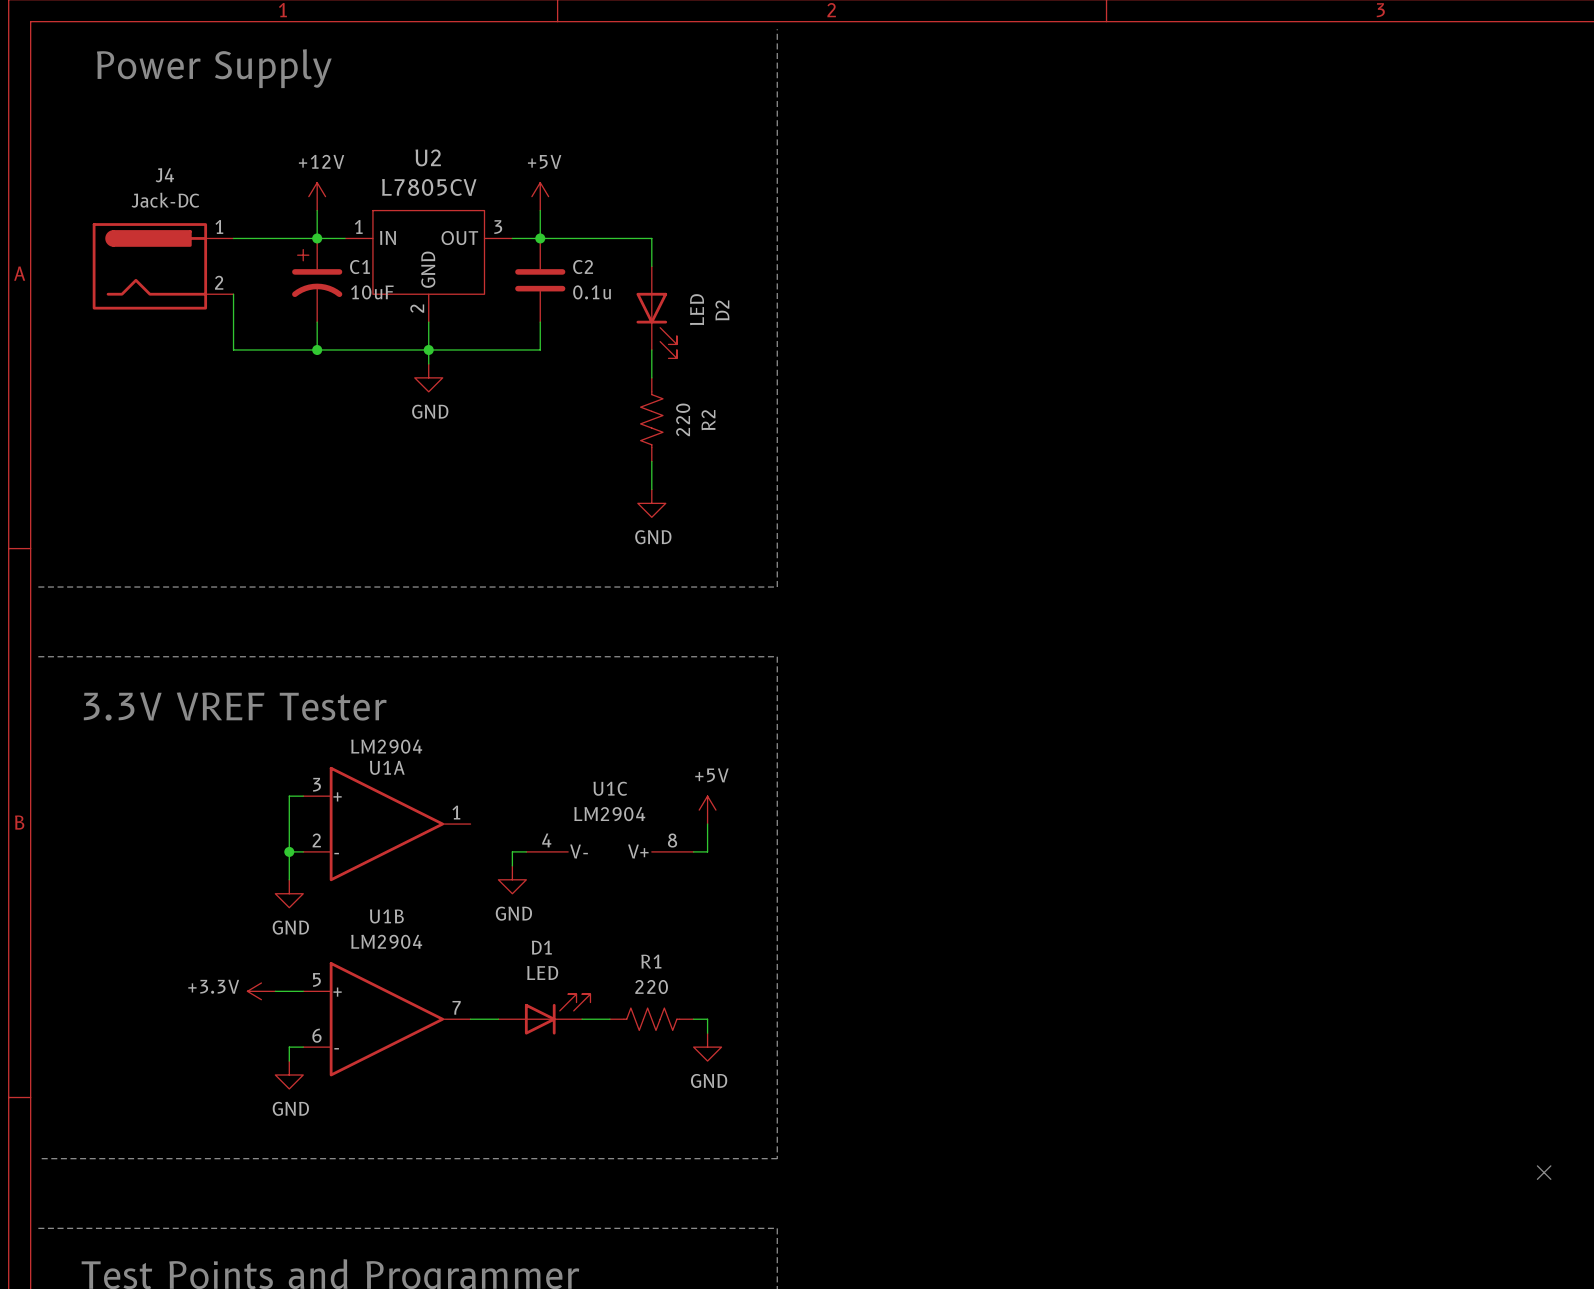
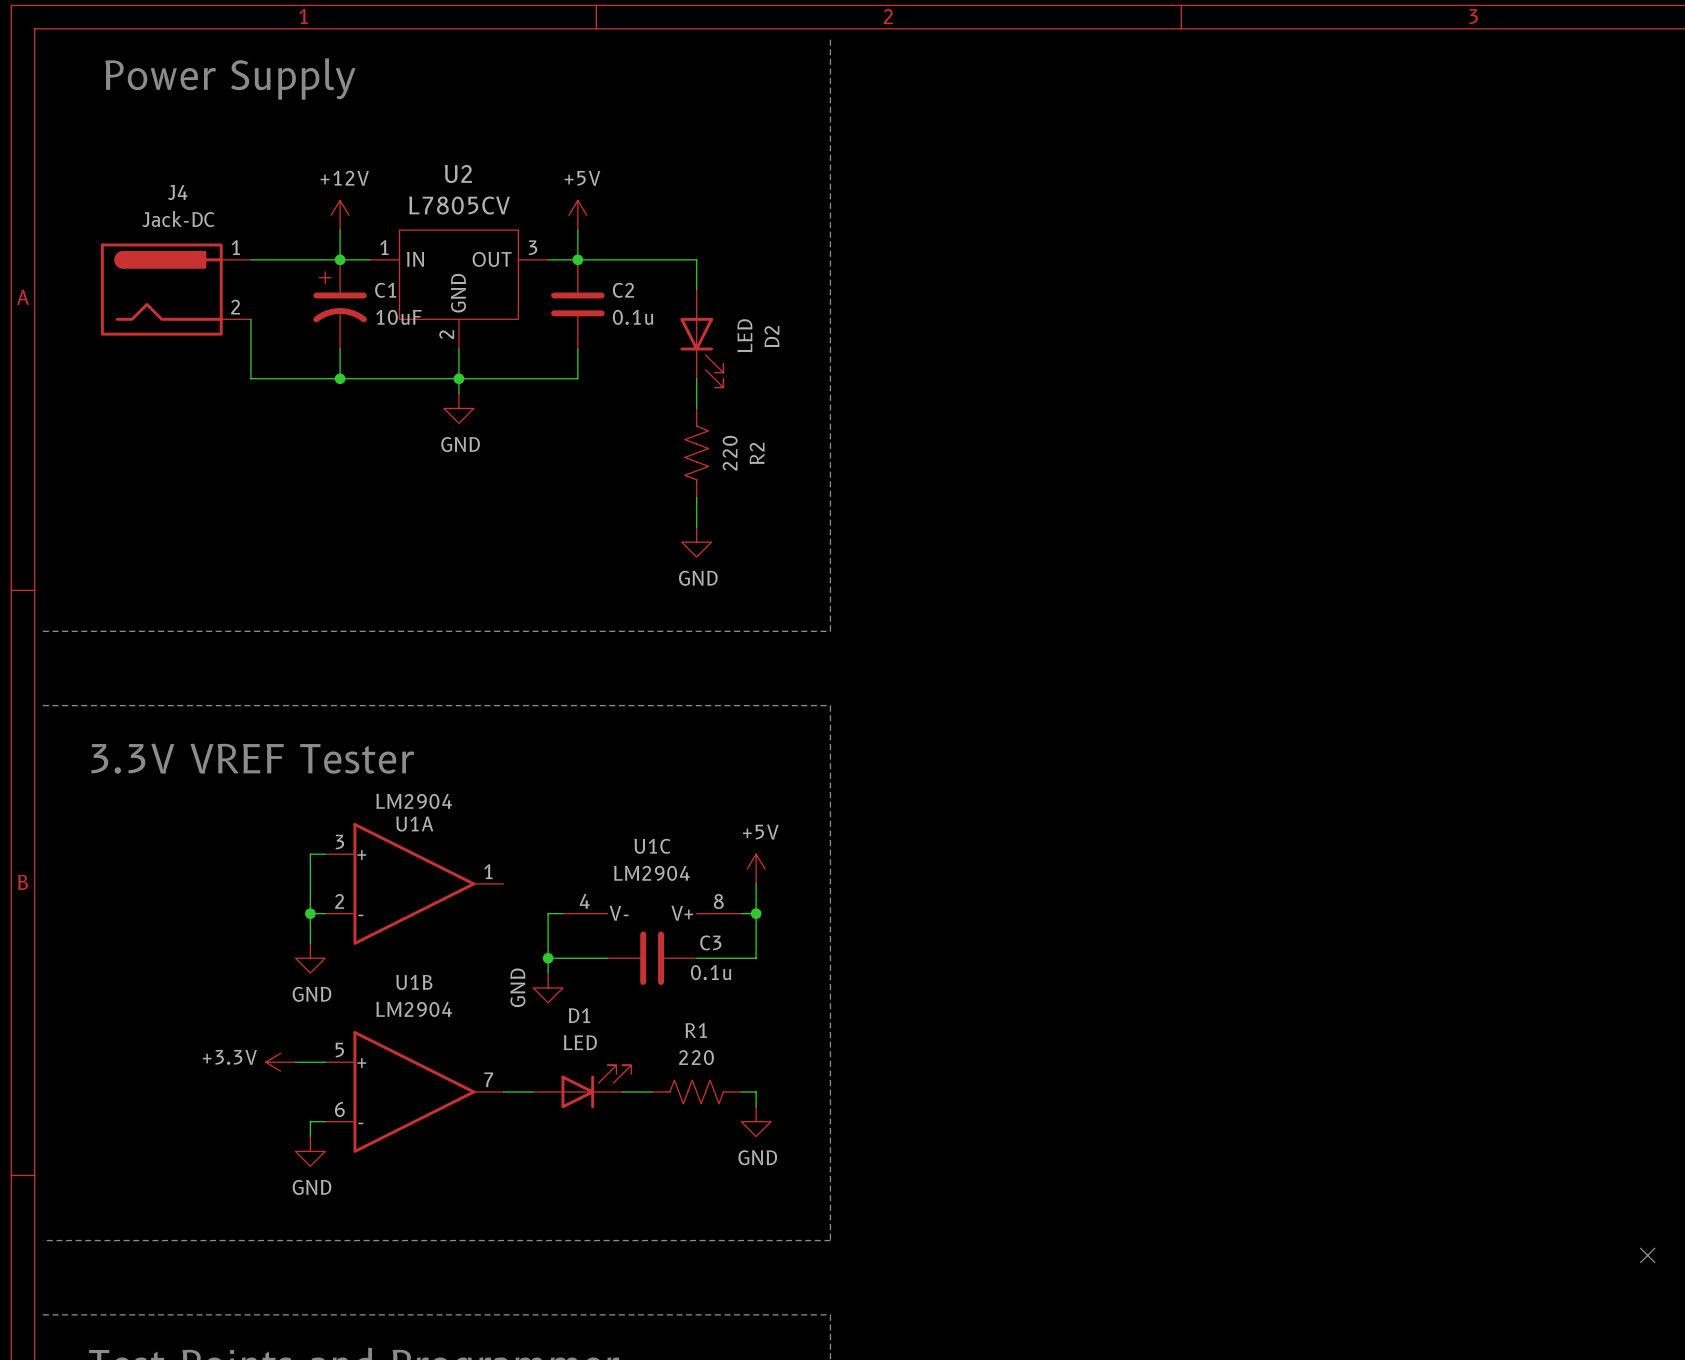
wire: none -> (756, 913) (756, 958) (696, 958)
junction: none -> (756, 913)
wire: none -> (548, 928) (548, 973)
power symbol position: GND (512, 879) -> GND (548, 987)
wire: none -> (548, 958) (607, 958)
junction: none -> (548, 958)
C3: none -> 0.1u (652, 958)
power symbol text rotation: 0° (513, 913) -> 90° counterclockwise (517, 987)

